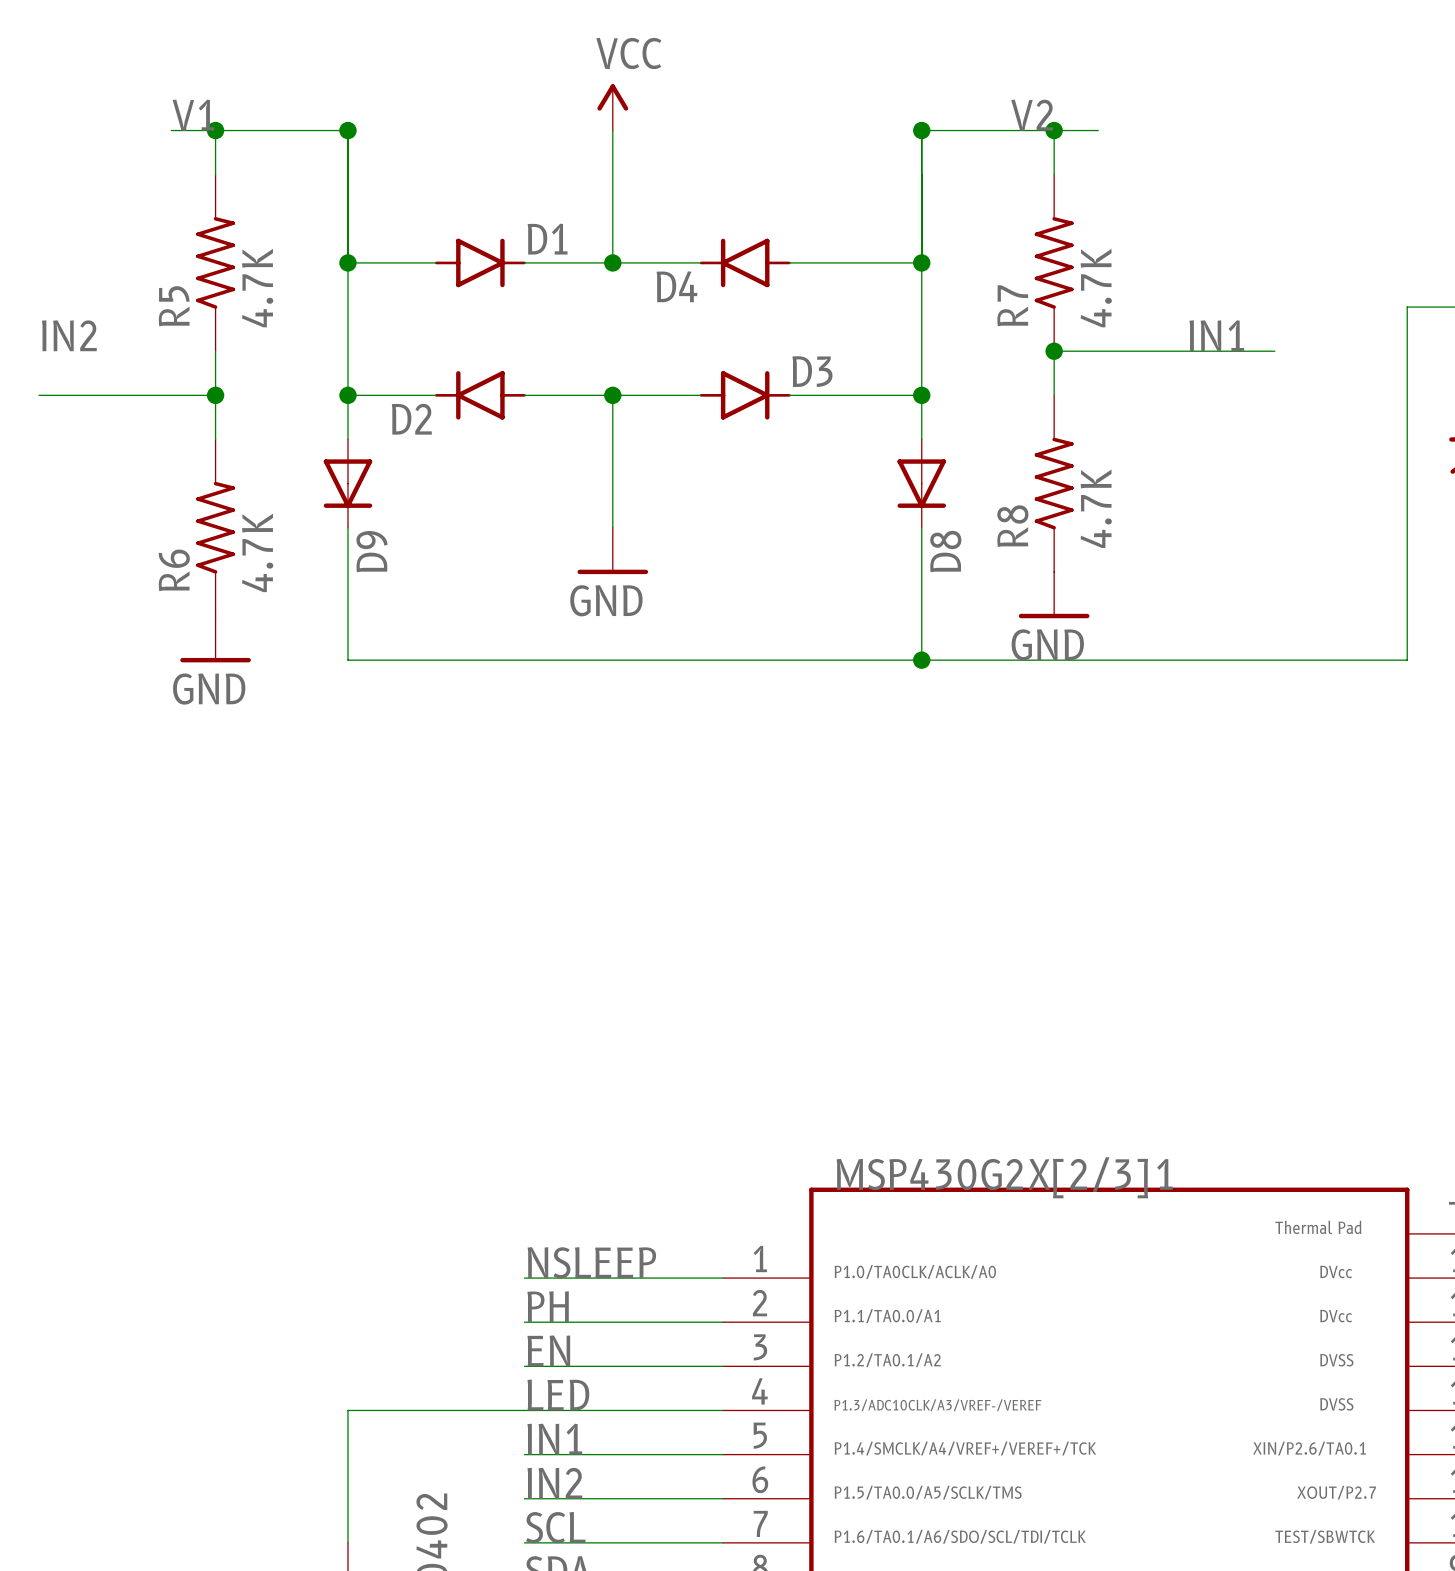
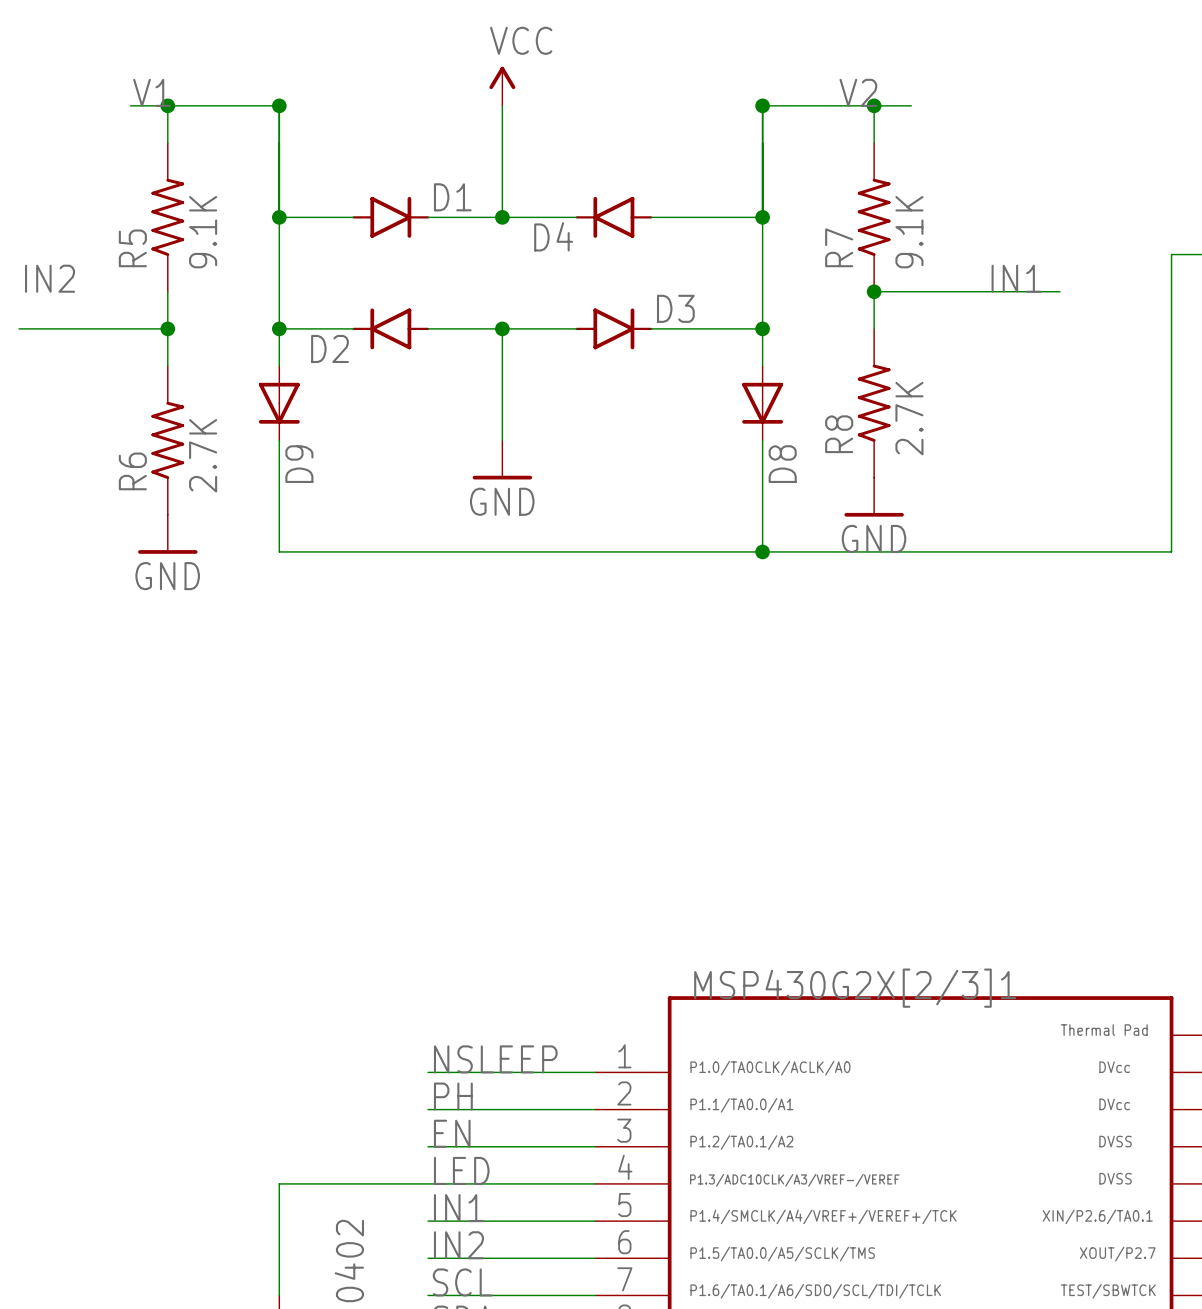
R5 value: 4.7K (257, 288) -> 9.1K (203, 232)
R7 value: 4.7K (1096, 288) -> 9.1K (909, 232)
R8 value: 4.7K (1096, 508) -> 2.7K (909, 418)
R6 value: 4.7K (257, 552) -> 2.7K (203, 455)

